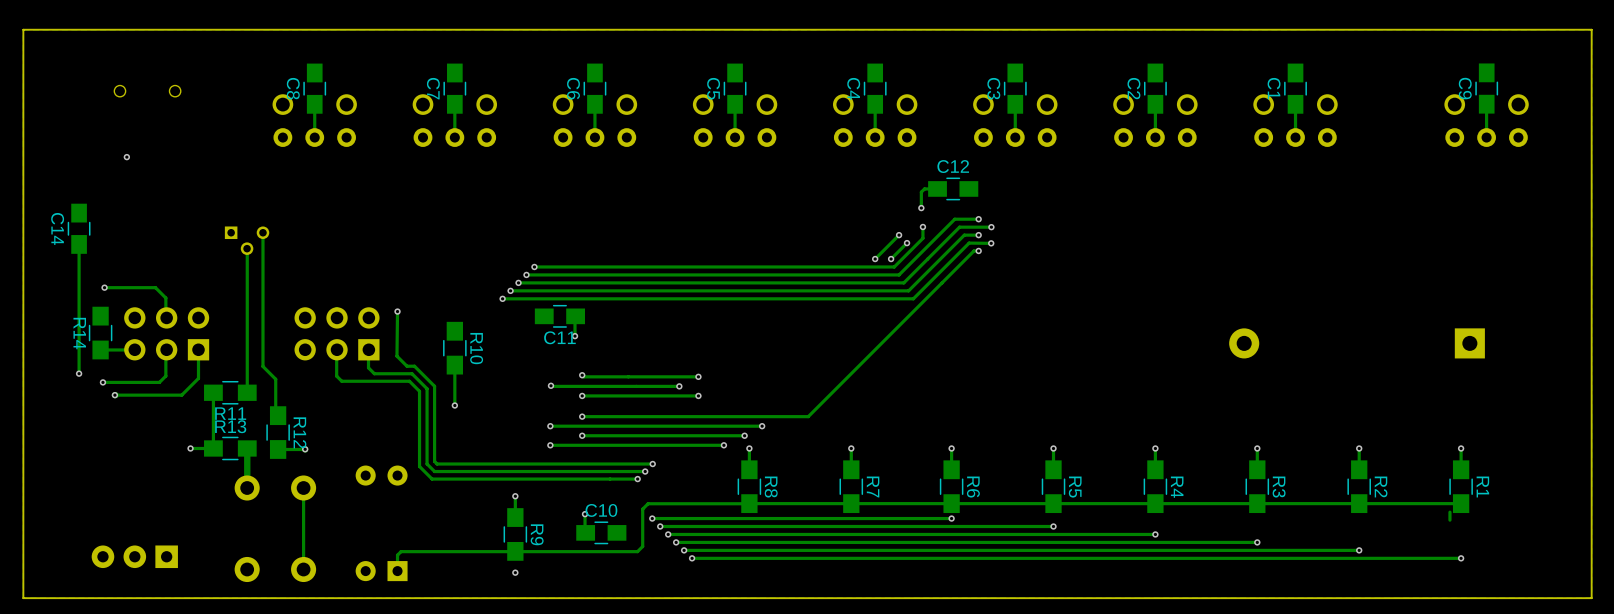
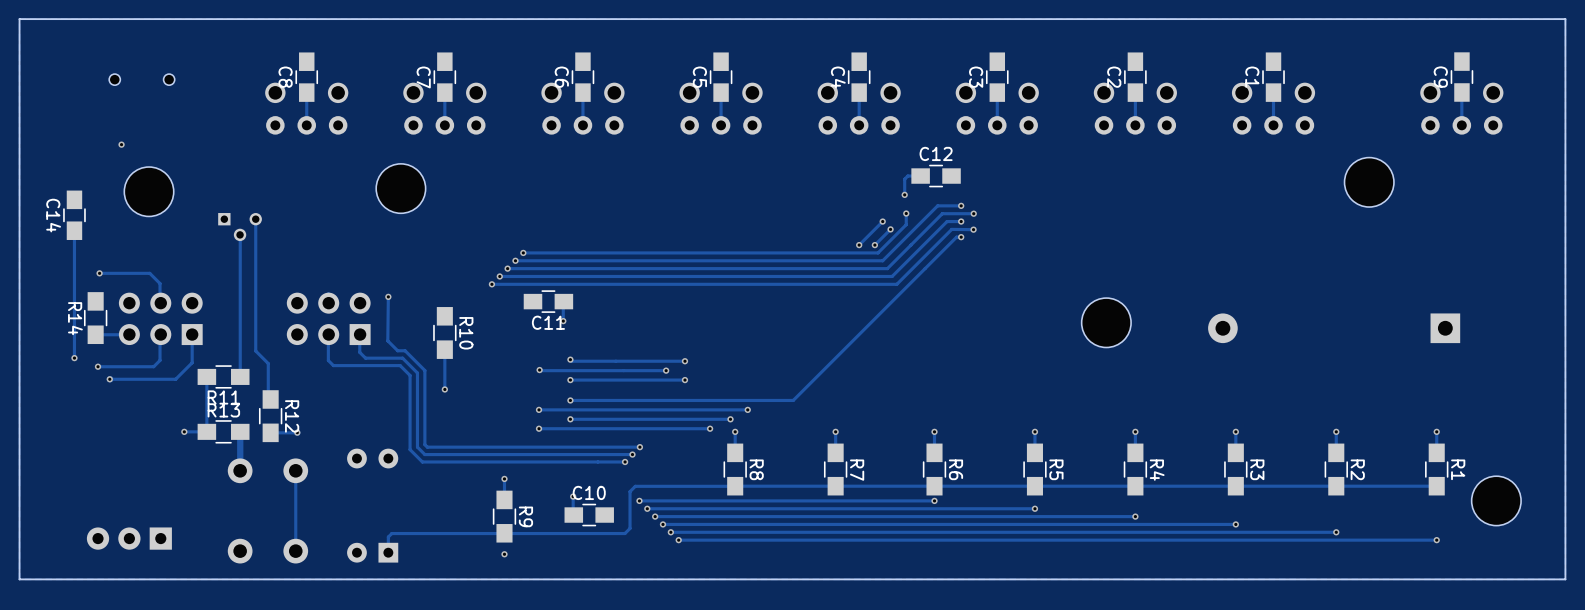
part: none -> (1369, 182)
part: none -> (400, 188)
part: none -> (149, 191)
part: none -> (1106, 322)
track: (1449, 512) (1449, 520) -> none
part: none -> (1496, 500)

